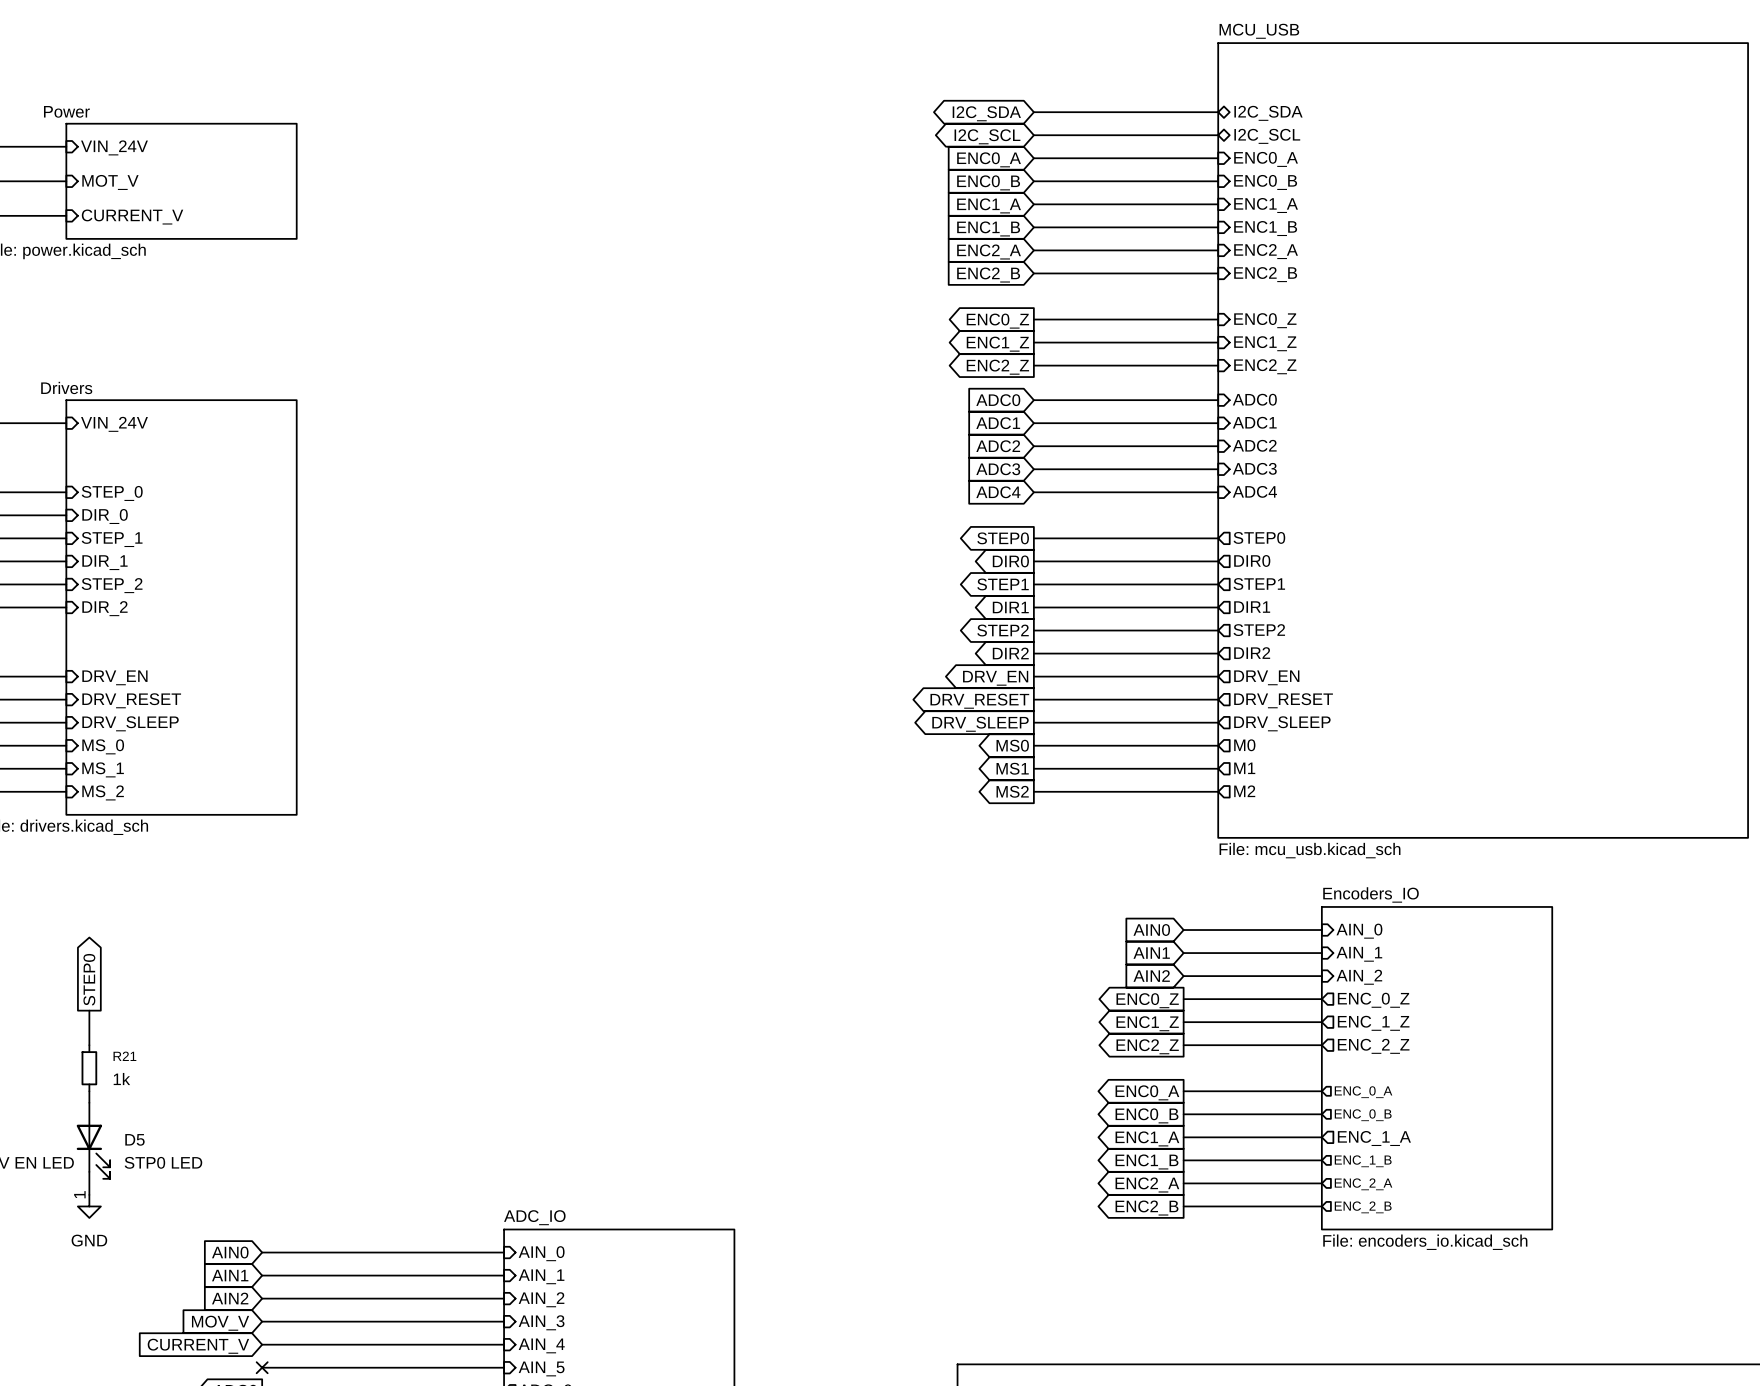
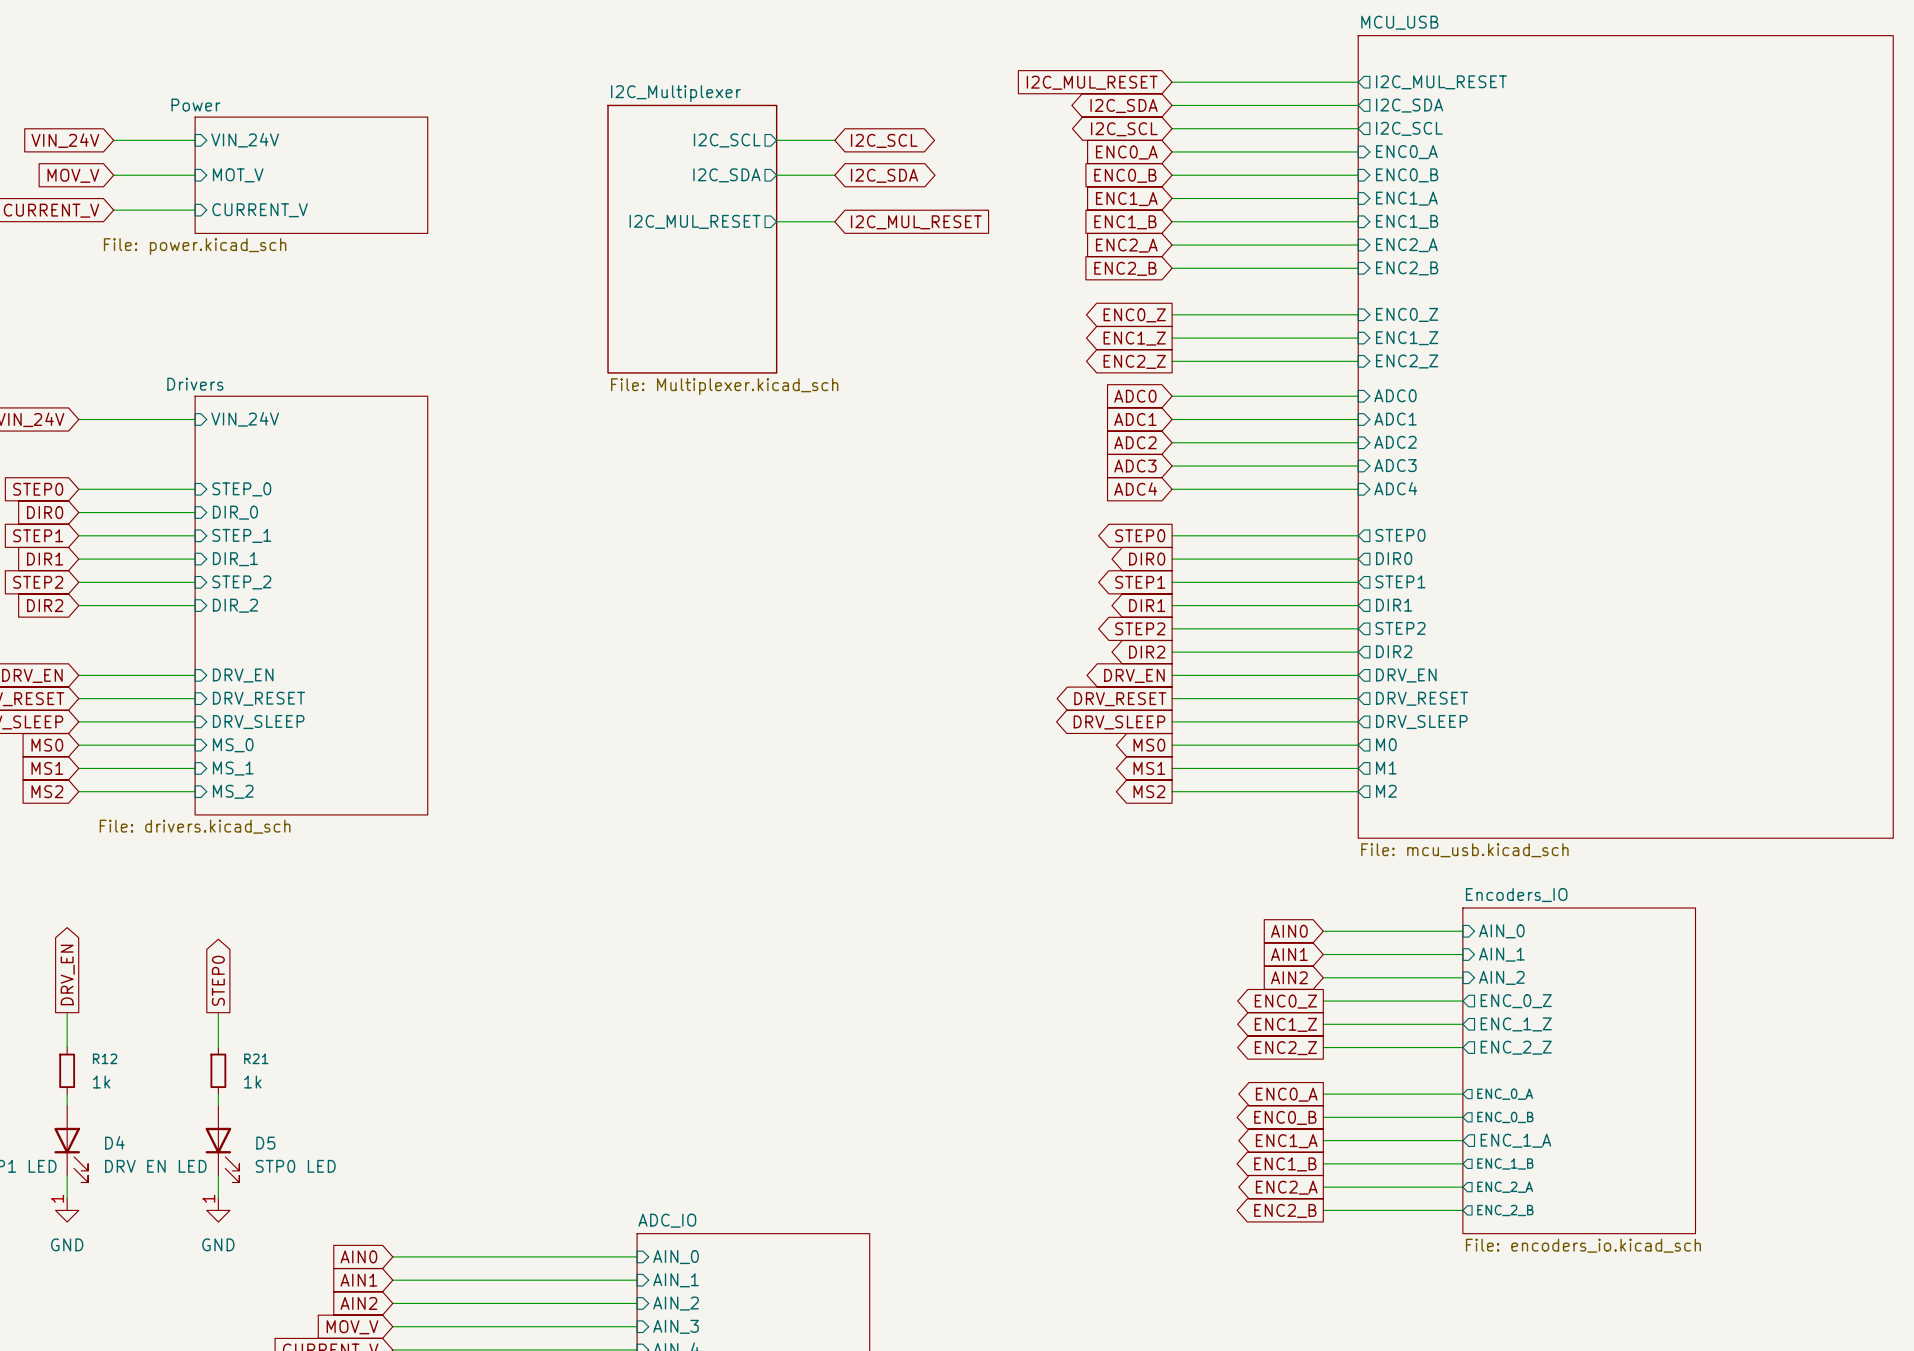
wire: none -> (1172, 82) (1358, 82)
global label: none -> I2C_MUL_RESET (1092, 82)
sheet pin: none -> I2C_MUL_RESET (1441, 82)
sheet pin shape: bidirectional (1268, 113) -> output (1409, 105)
sheet pin shape: bidirectional (1267, 136) -> output (1409, 128)
wire: none -> (776, 140) (834, 140)
sheet pin: none -> I2C_SCL (727, 140)
global label: none -> I2C_SCL (884, 140)
wire: none -> (776, 175) (834, 175)
sheet pin: none -> I2C_SDA (726, 175)
global label: none -> I2C_SDA (884, 175)
wire: none -> (776, 221) (834, 221)
sheet pin: none -> I2C_MUL_RESET (695, 221)
global label: none -> I2C_MUL_RESET (916, 222)
sheet I2C_Multiplexer: none -> File: Multiplexer.kicad_sch (692, 239)

